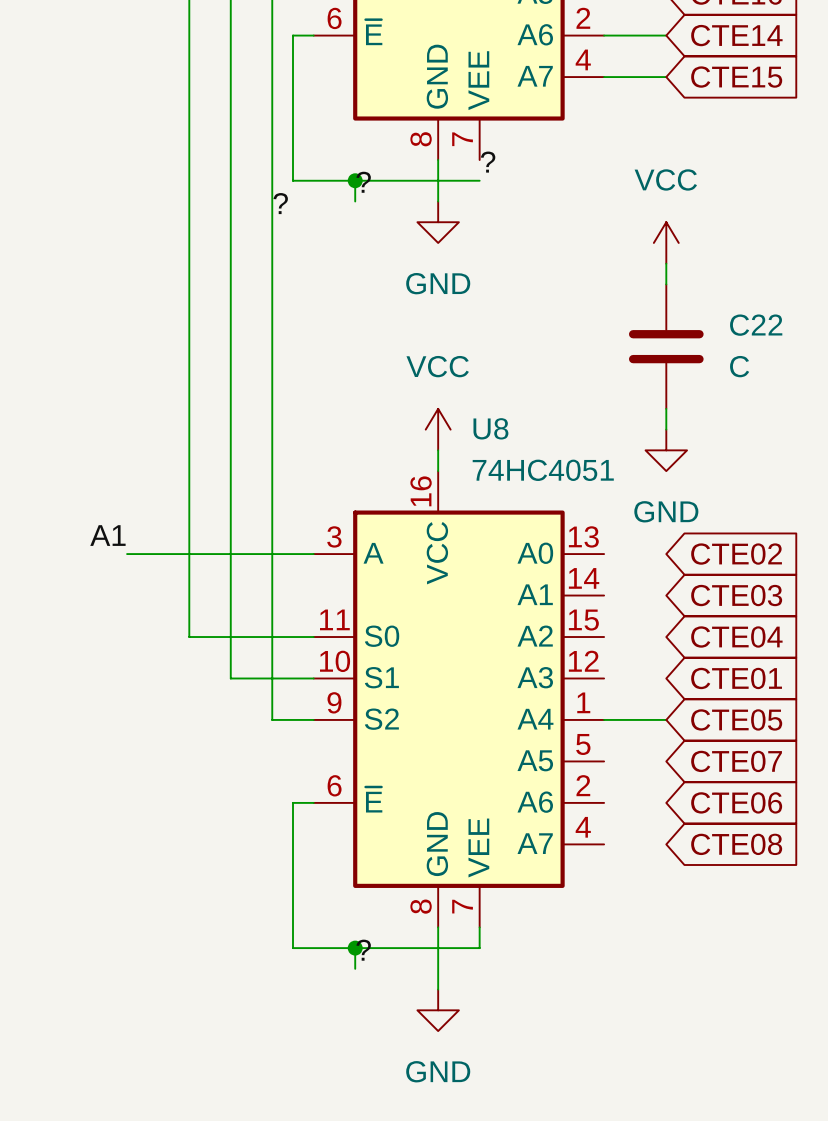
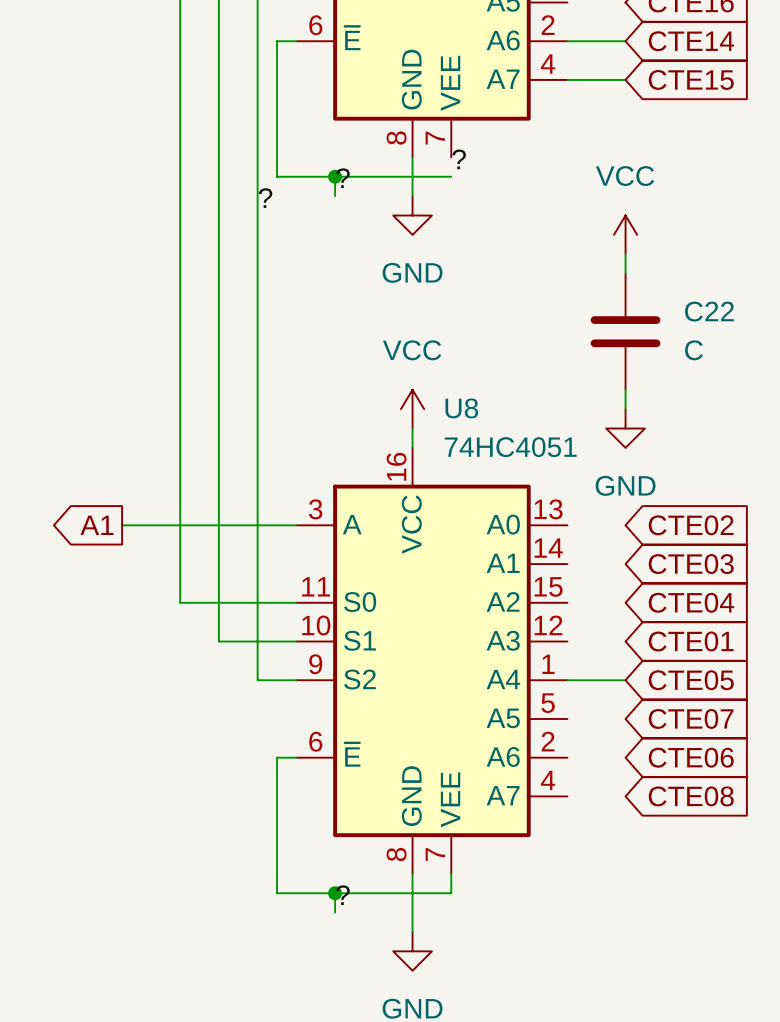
label: A1 (107, 535) -> none
global label: none -> A1 (96, 525)

